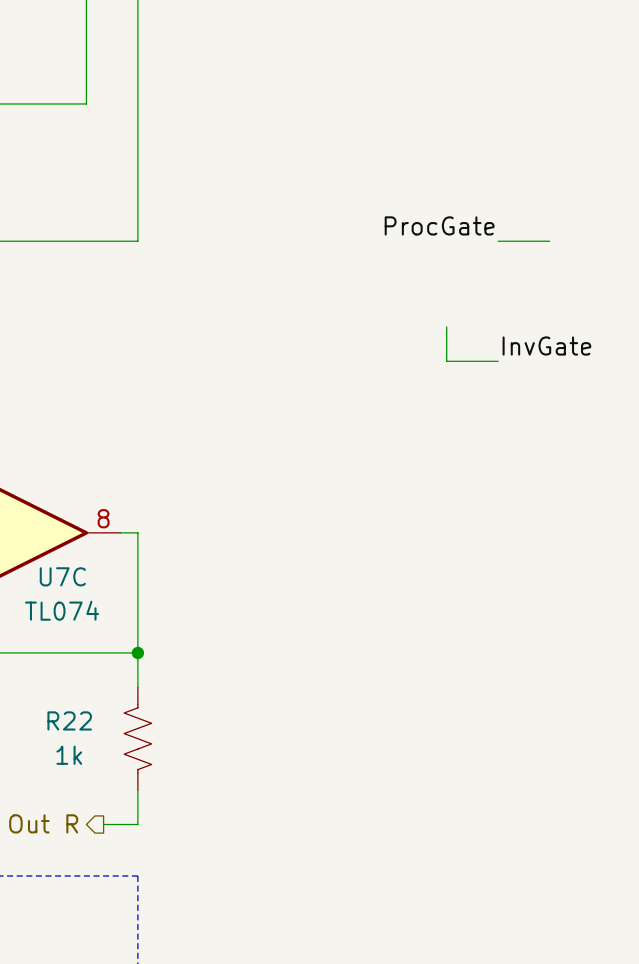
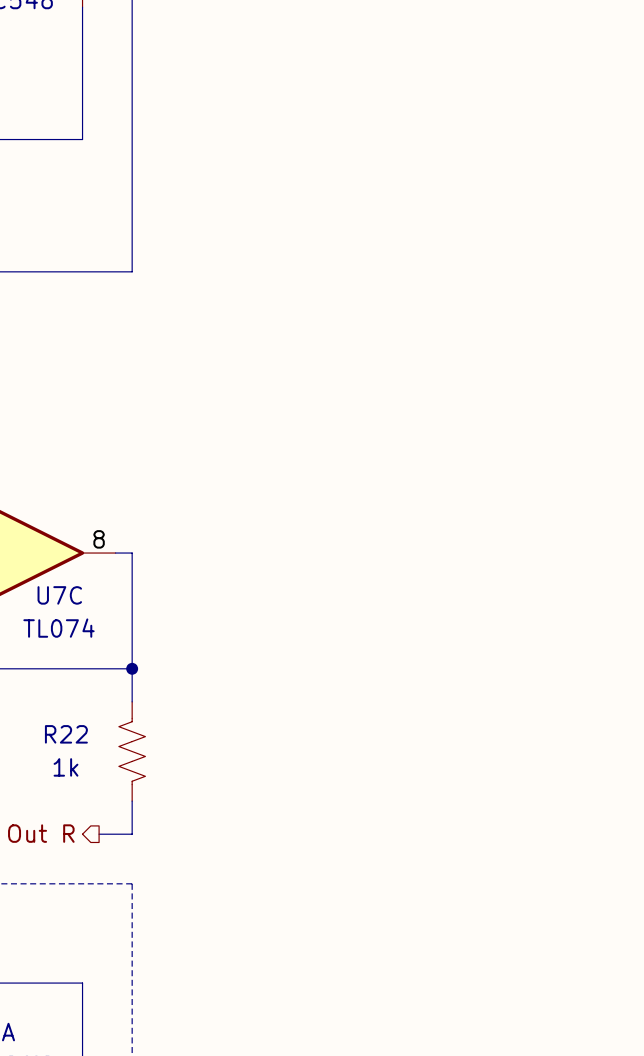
label: ProcGate (439, 225) -> none
wire: (498, 241) (549, 241) -> none
wire: (446, 327) (446, 361) (498, 361) -> none
label: InvGate (546, 346) -> none

